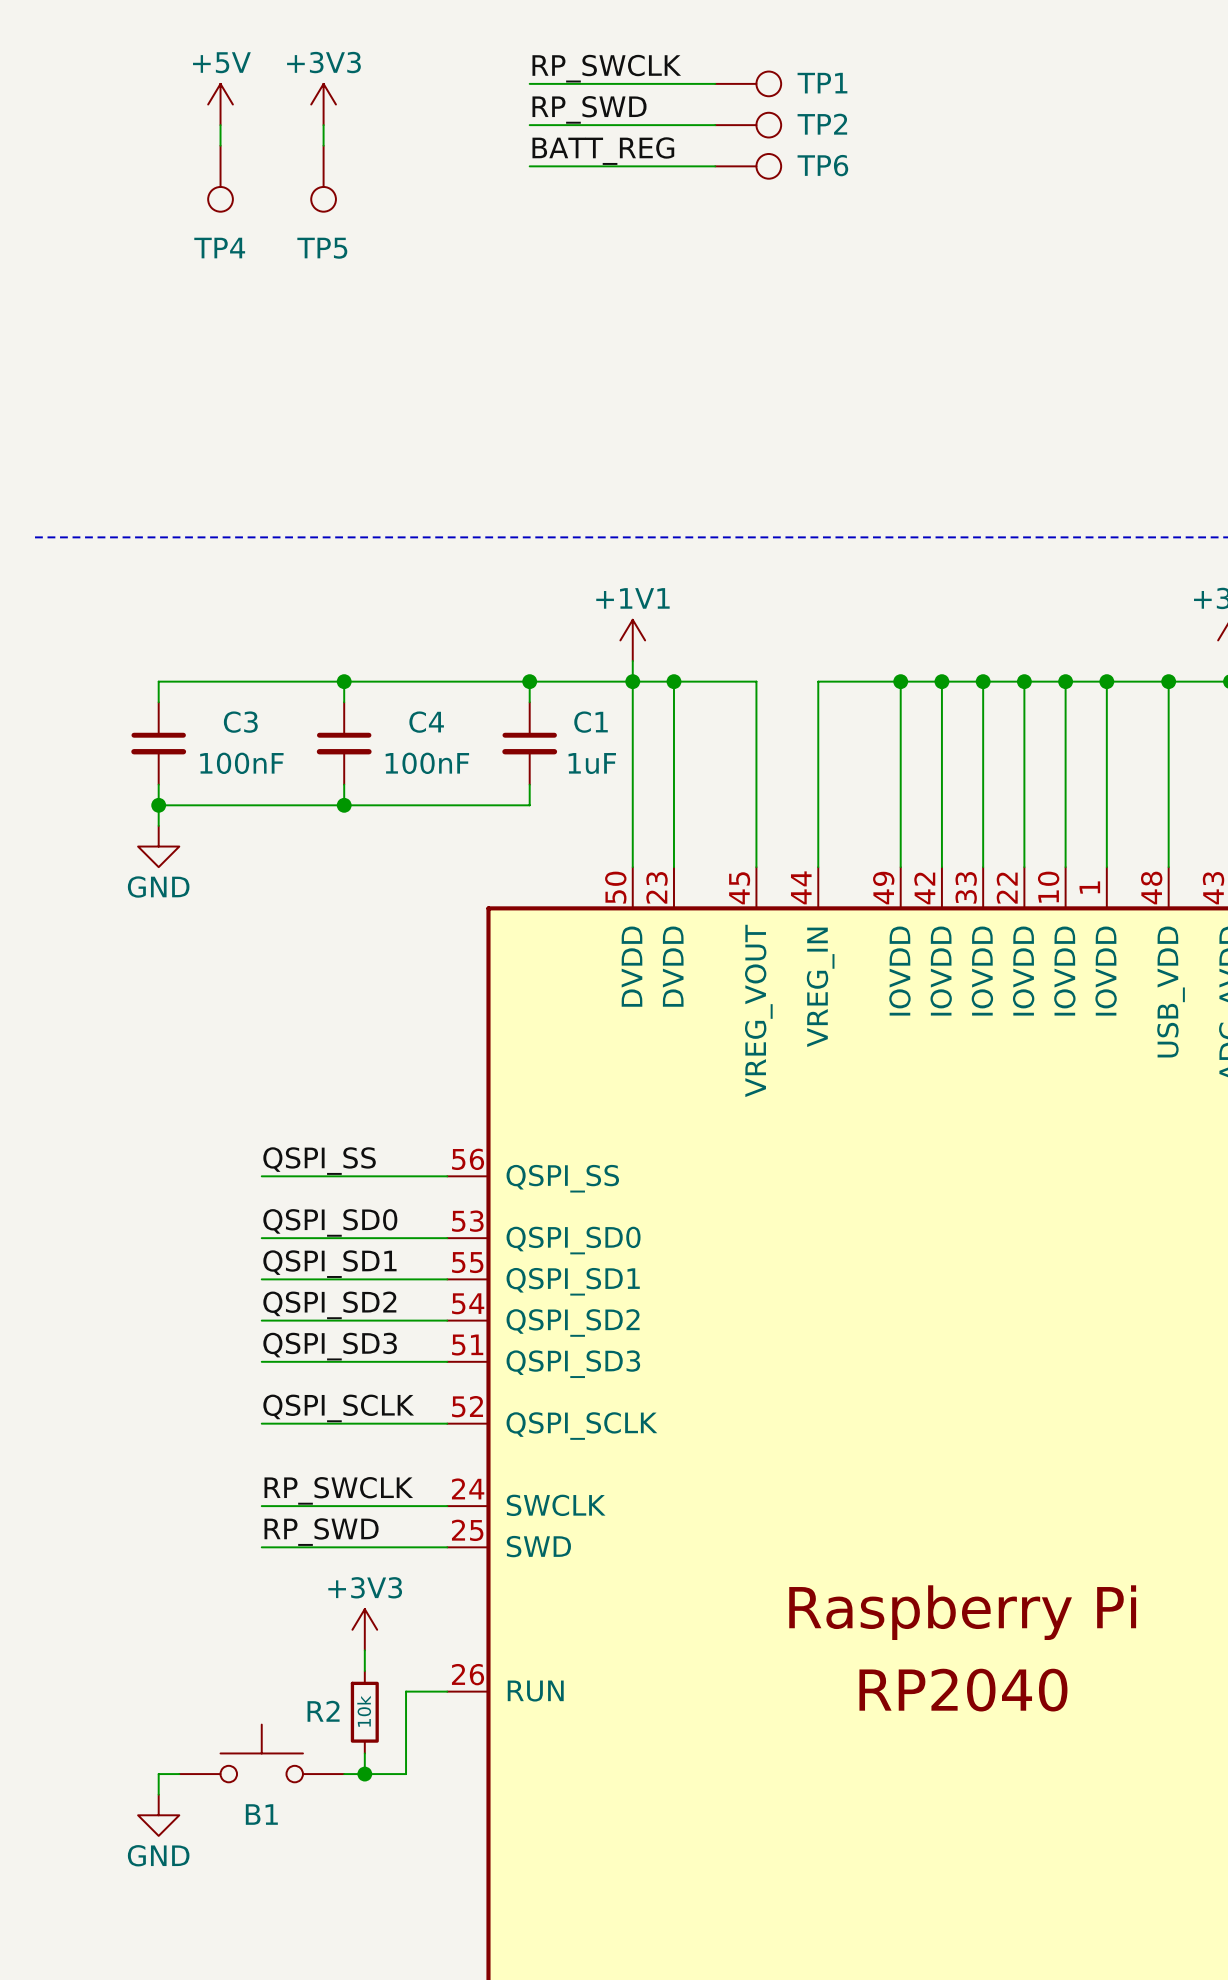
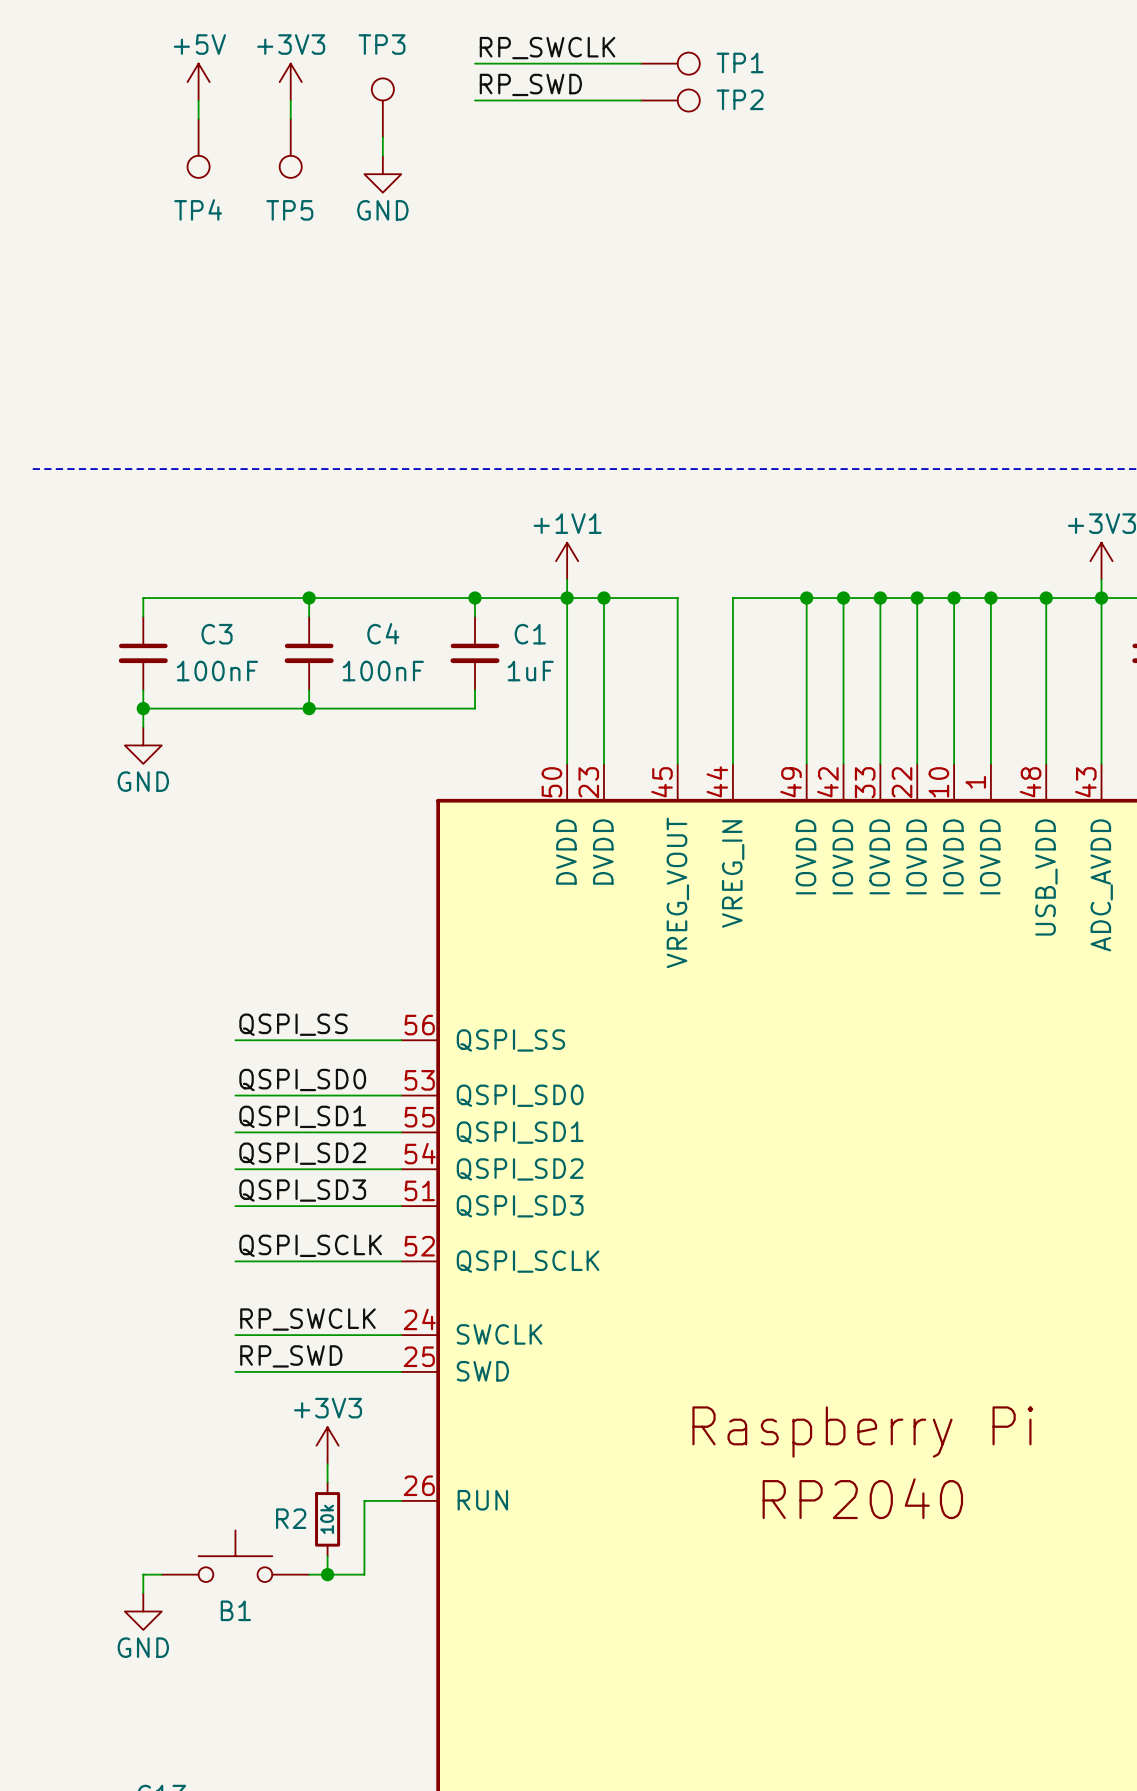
TP3: none -> (382, 107)
label: BATT_REG (603, 151) -> none
wire: none -> (382, 137) (382, 155)
wire: (529, 166) (715, 166) -> none
TP6: (748, 166) -> none
power symbol: none -> GND (382, 174)

